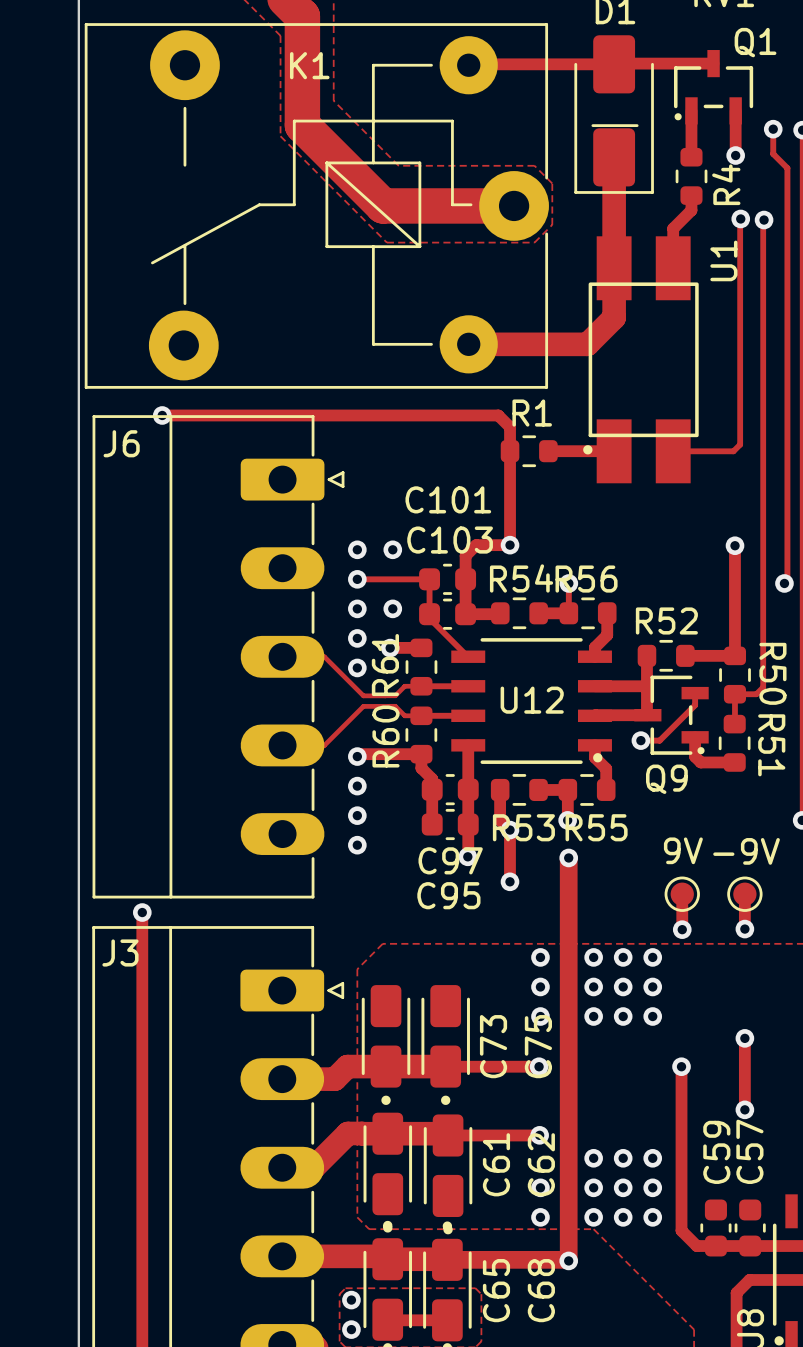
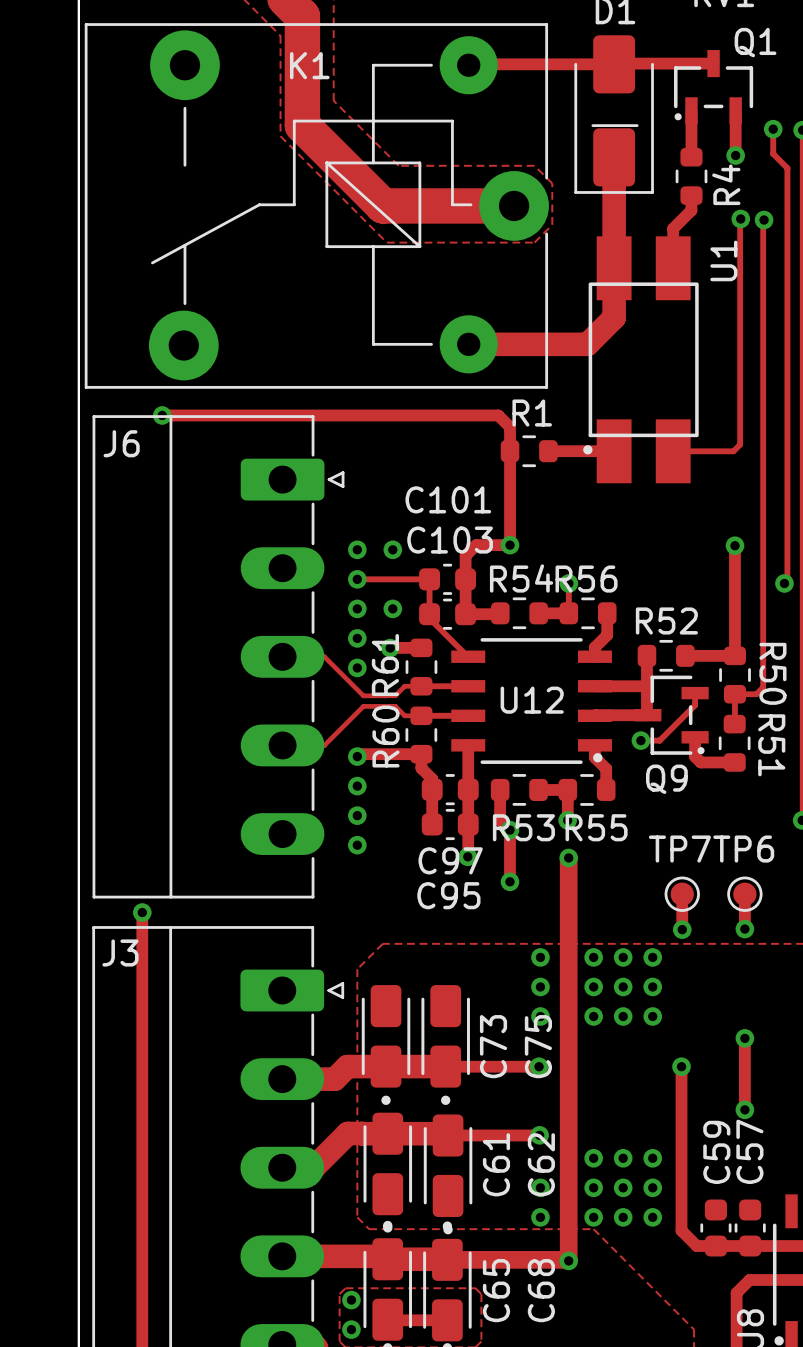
TP7 name: none -> TP7 (679, 849)
TP6 name: none -> TP6 (743, 849)
TP7 value: 9V (683, 850) -> none
TP6 value: -9V (746, 851) -> none

